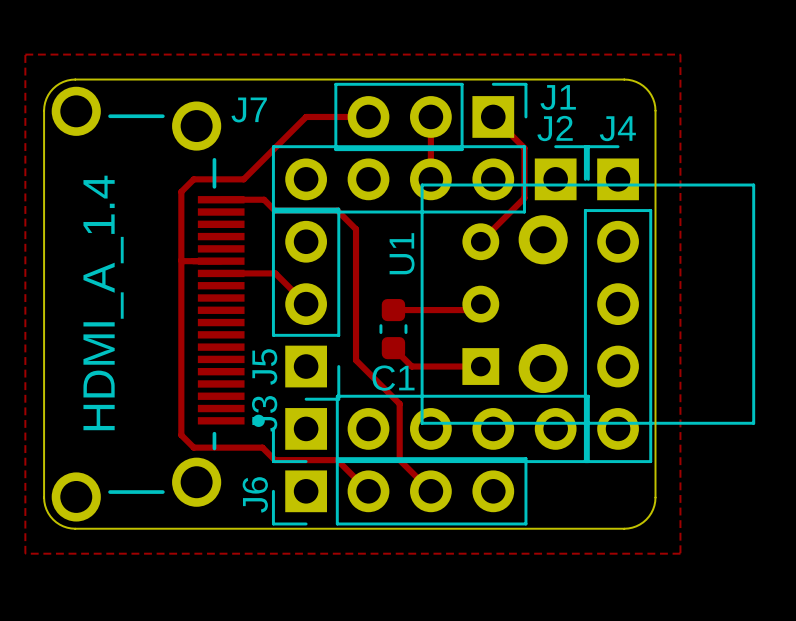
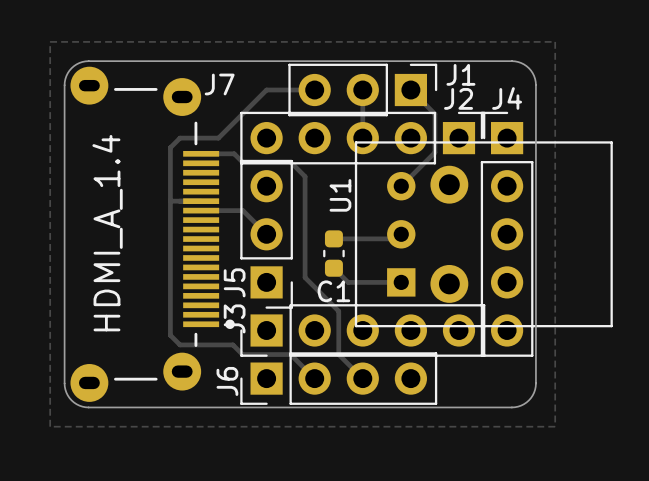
J7 footprint: [51, 86, 265, 522] -> [70, 66, 235, 402]

